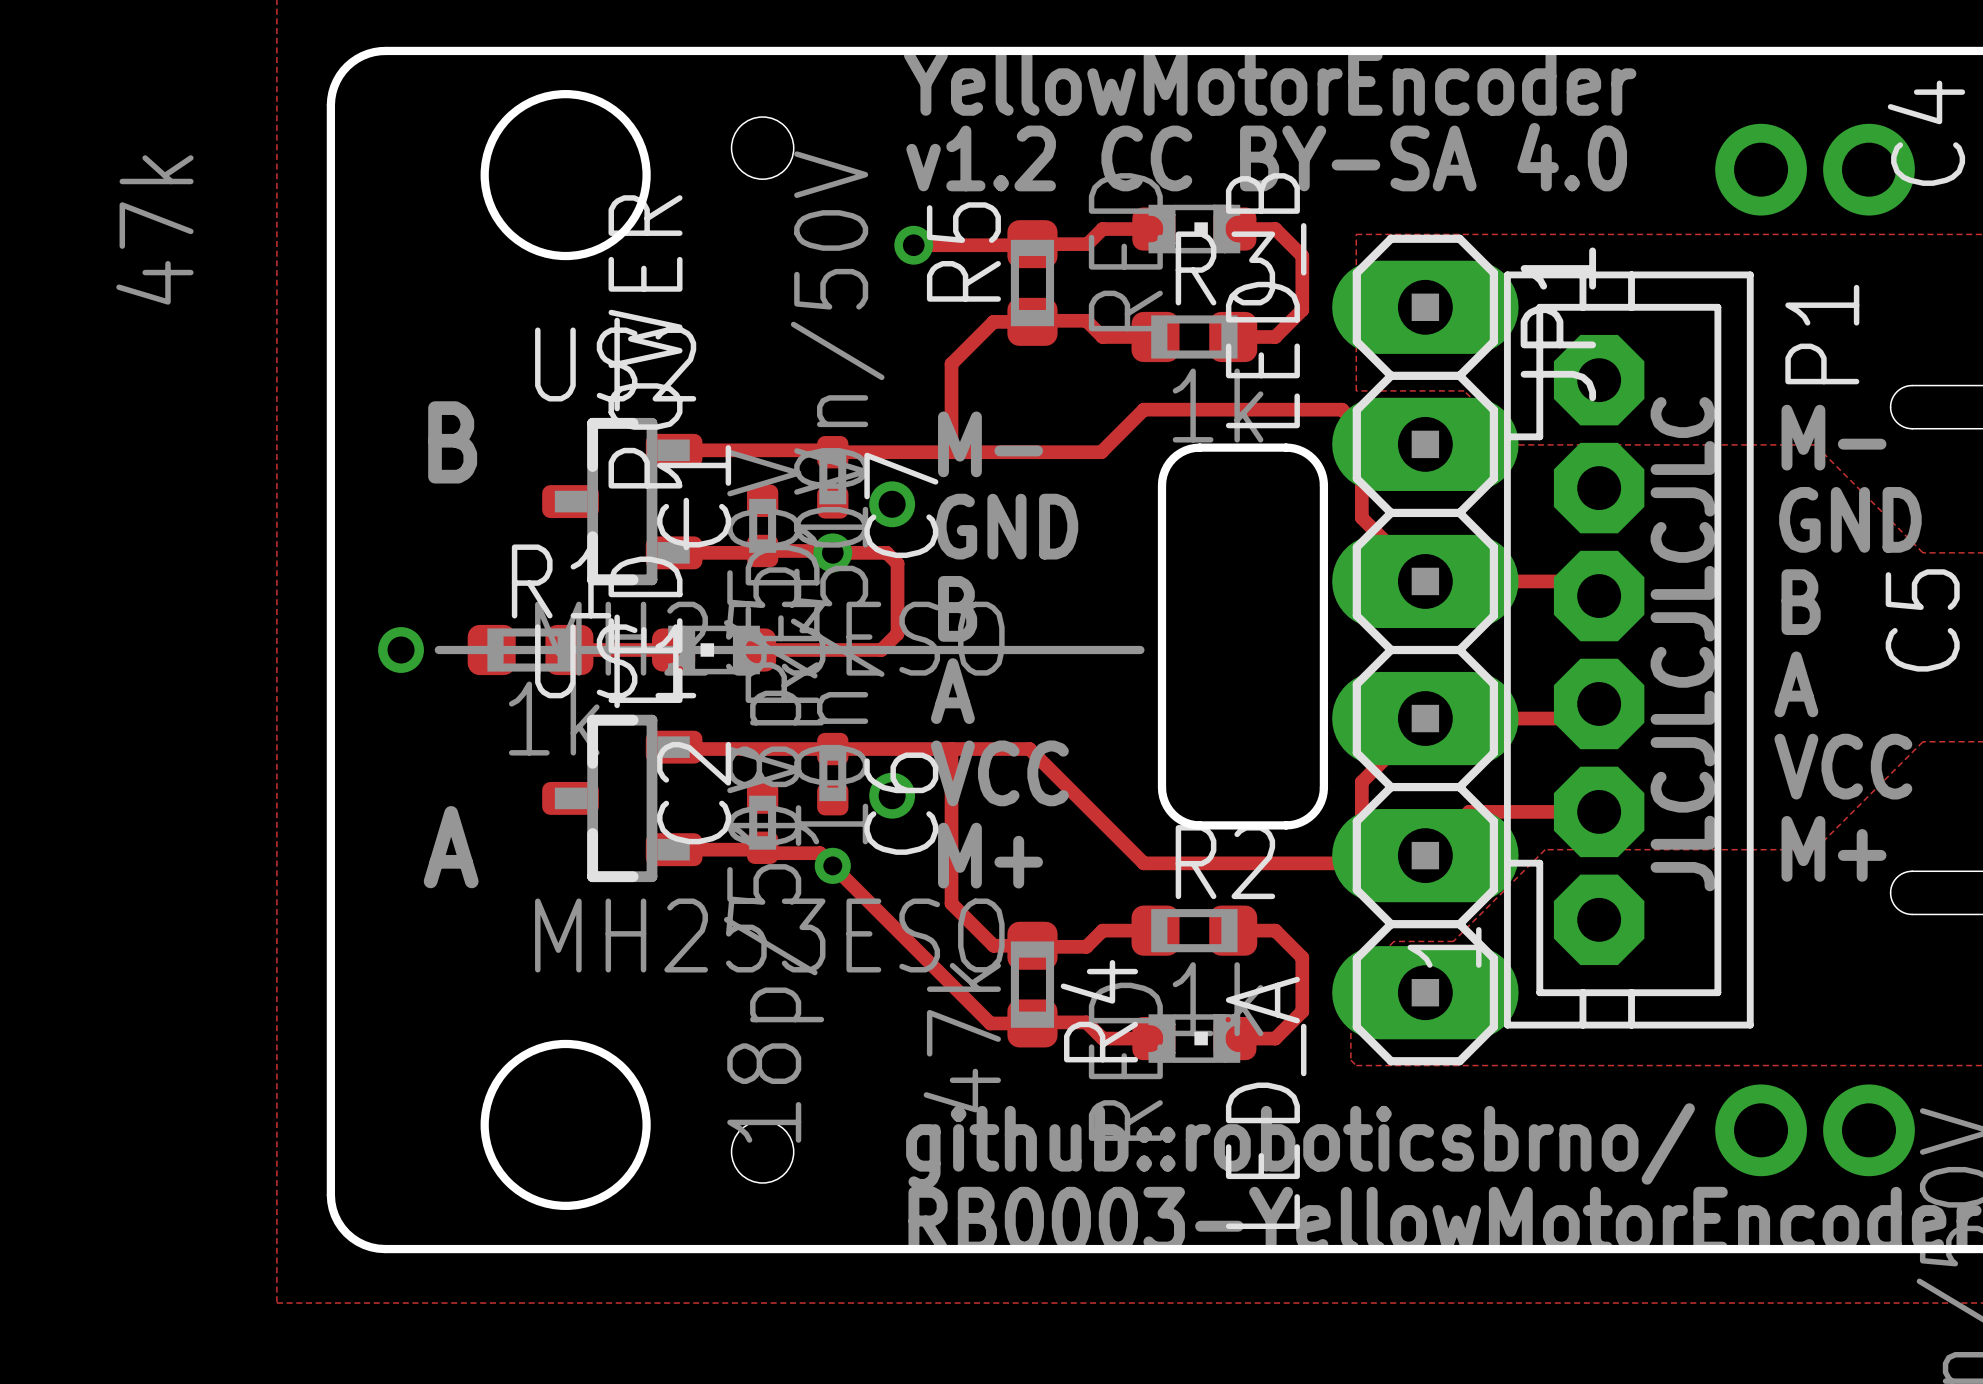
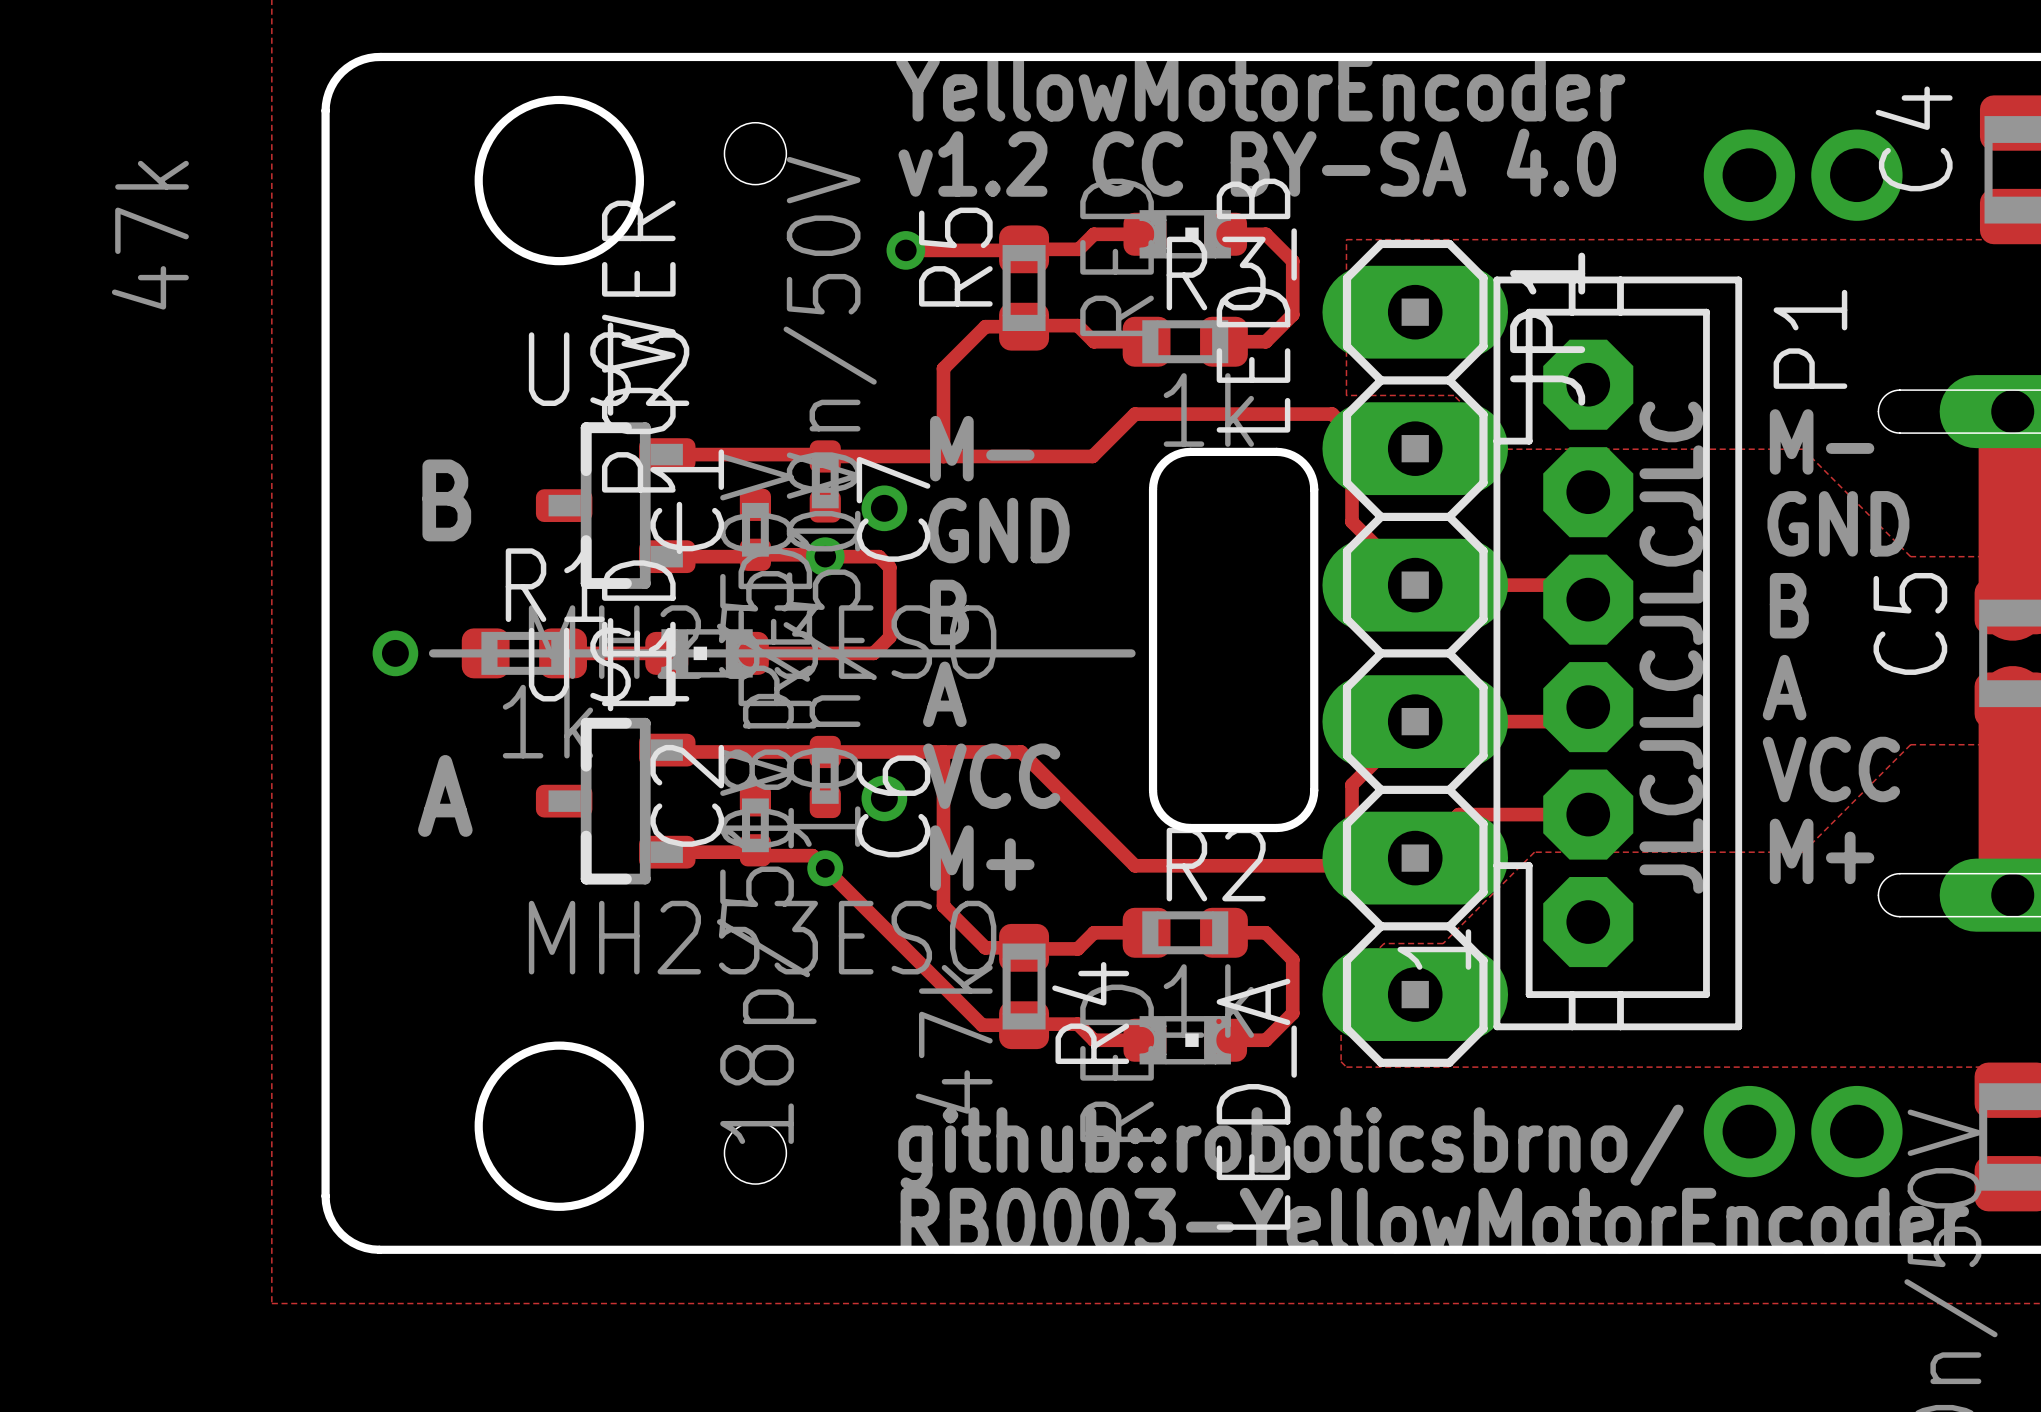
text position: B (452, 442) -> B (446, 500)
text position: A (451, 847) -> A (445, 795)

